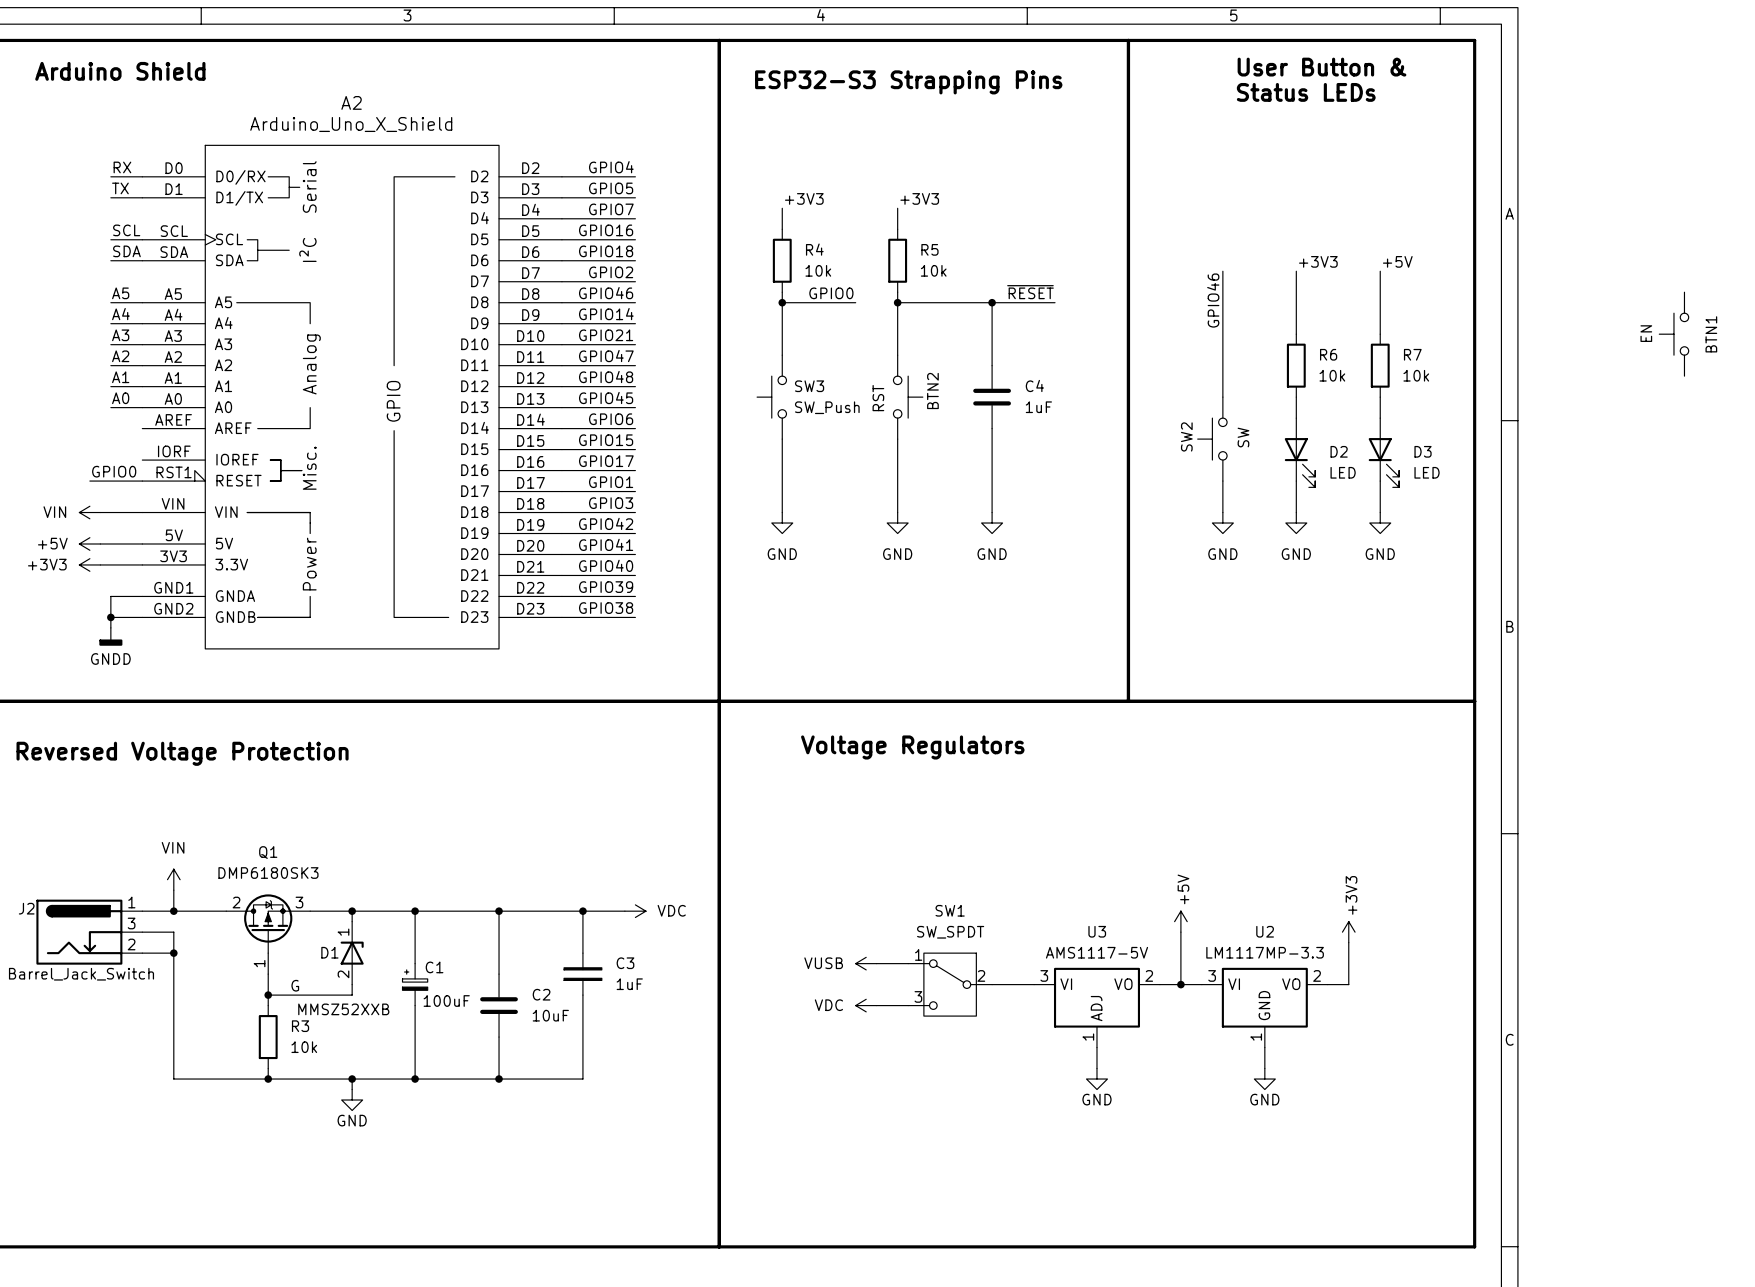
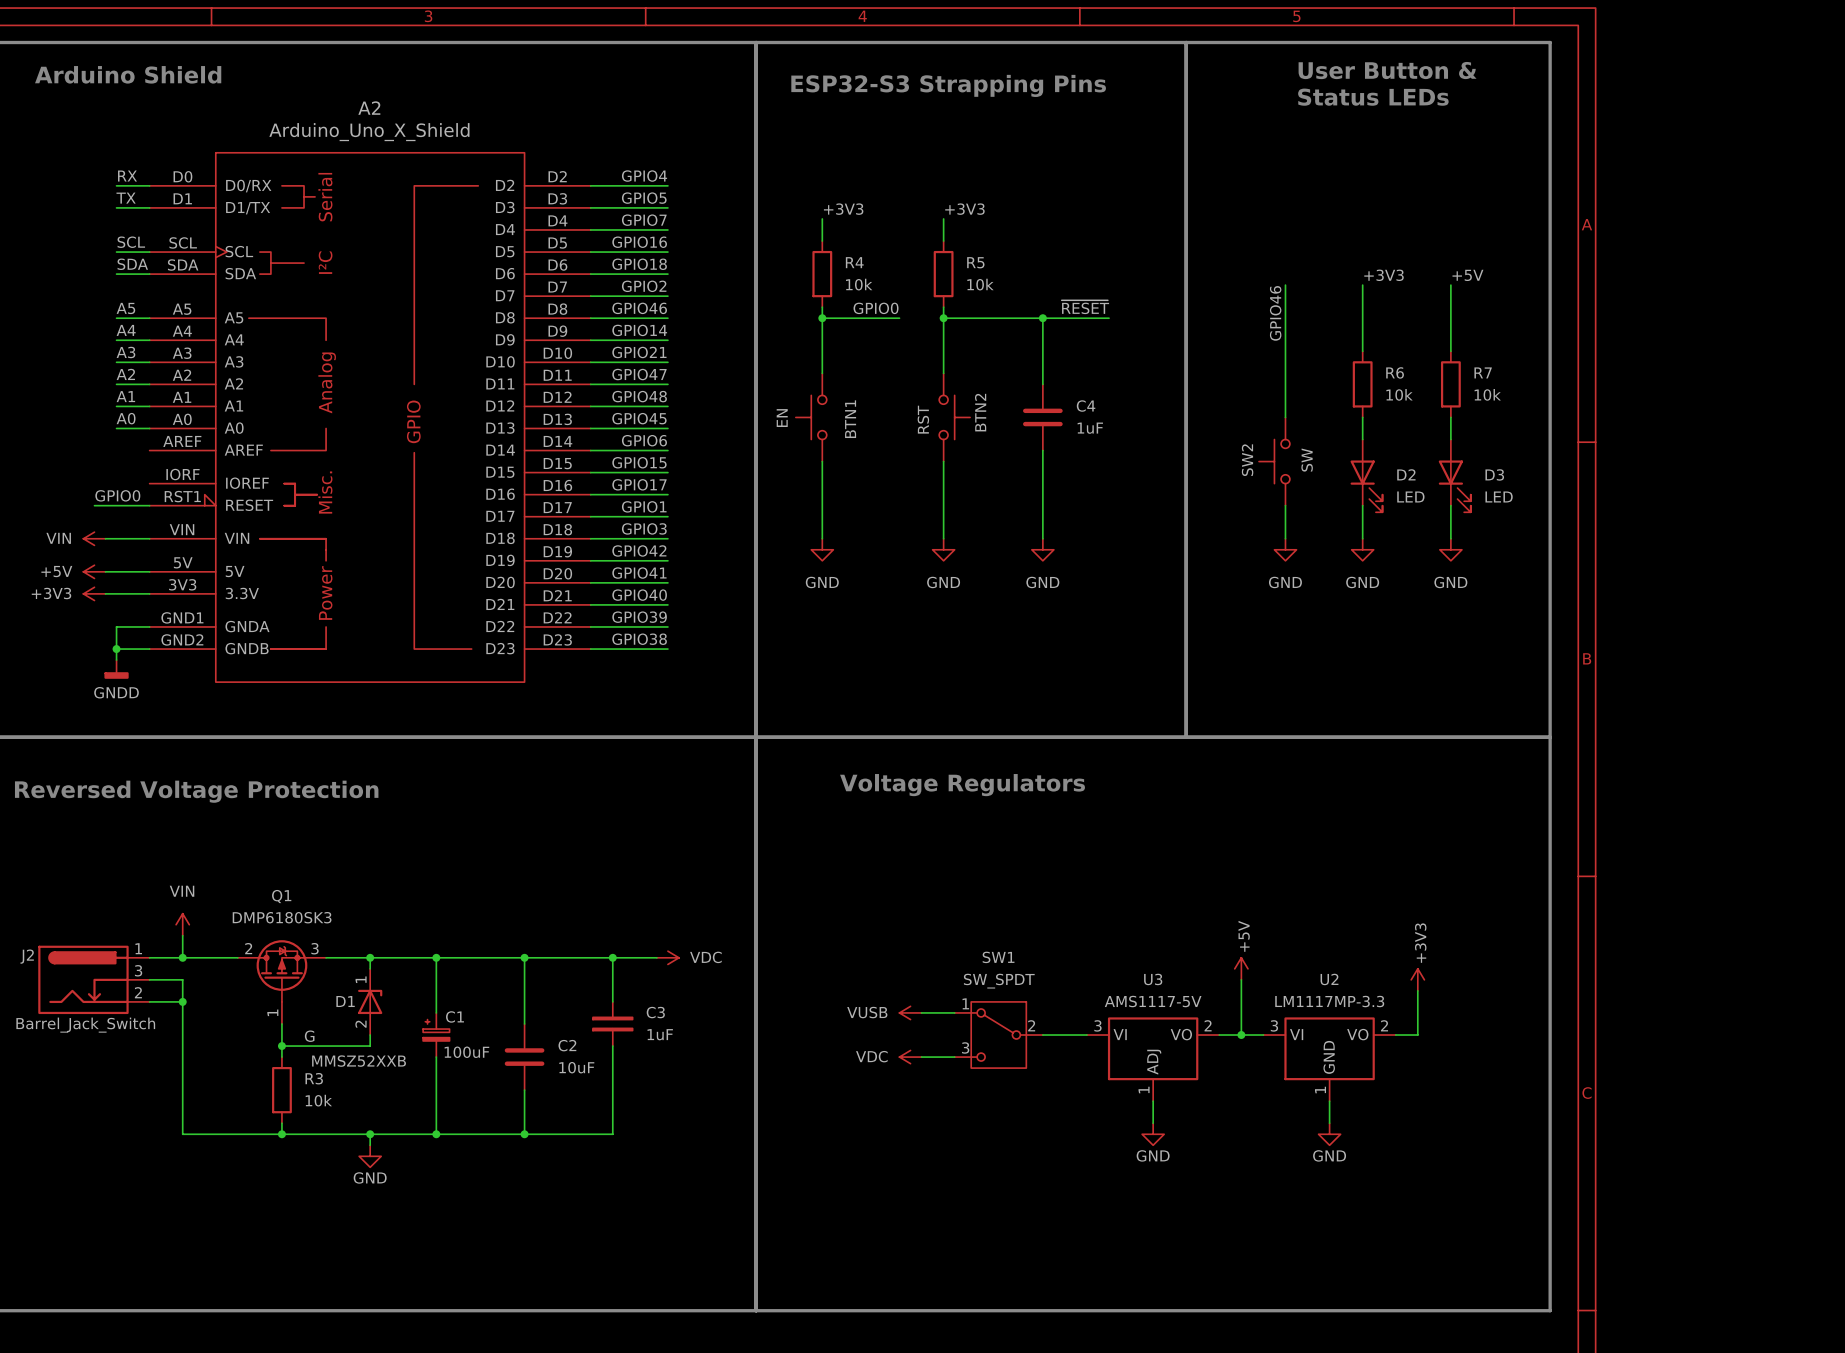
BTN1: EN (1673, 334) -> none
SW3 name: SW3 (809, 386) -> BTN1 (850, 419)
SW3 value: SW_Push (827, 407) -> EN (782, 418)

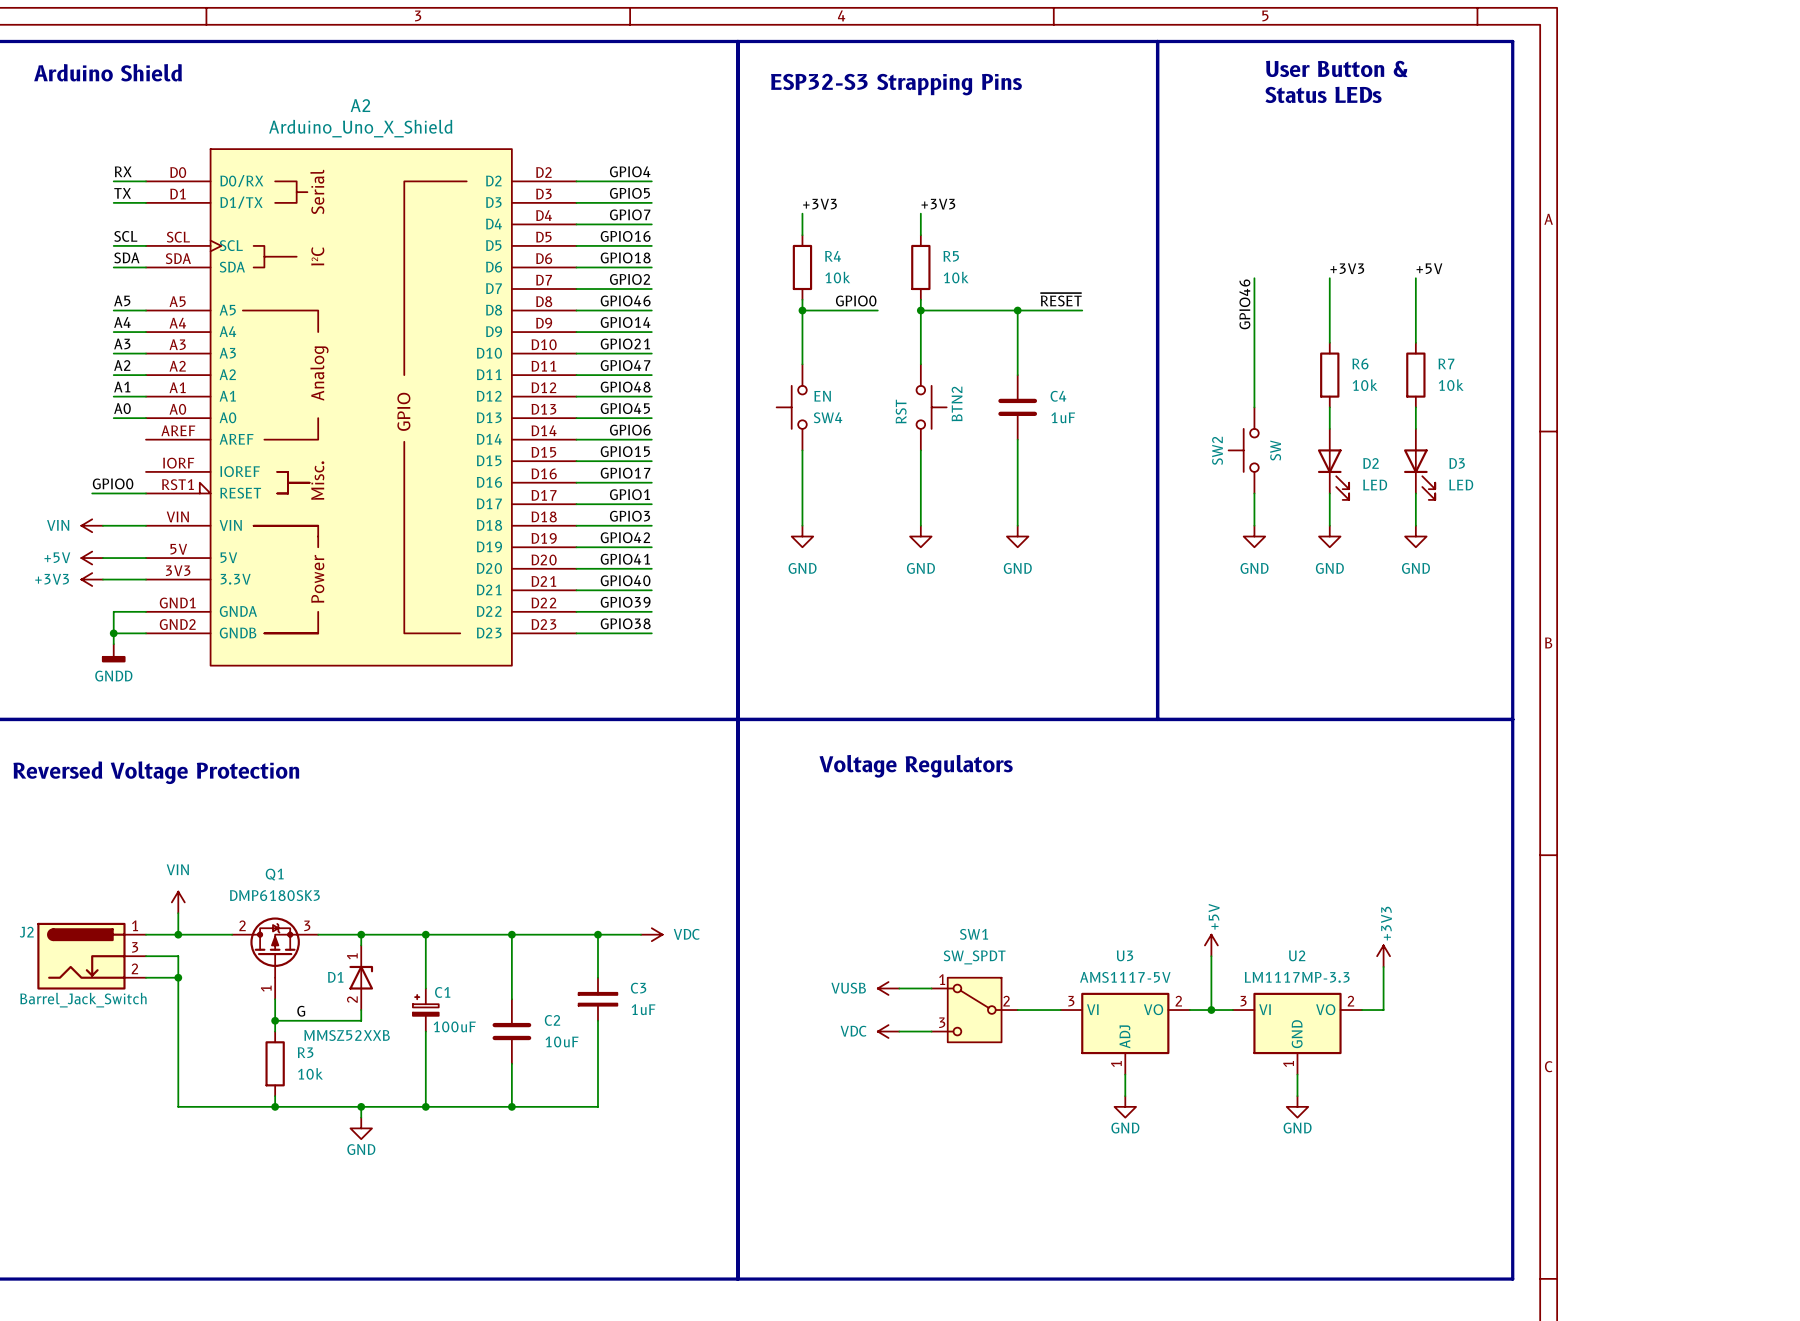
BTN1 value rotation: 0° (782, 418) -> 90° clockwise (822, 396)
BTN1 value position: EN (782, 418) -> EN (822, 396)
BTN1 name: BTN1 (850, 419) -> SW4 (828, 417)

